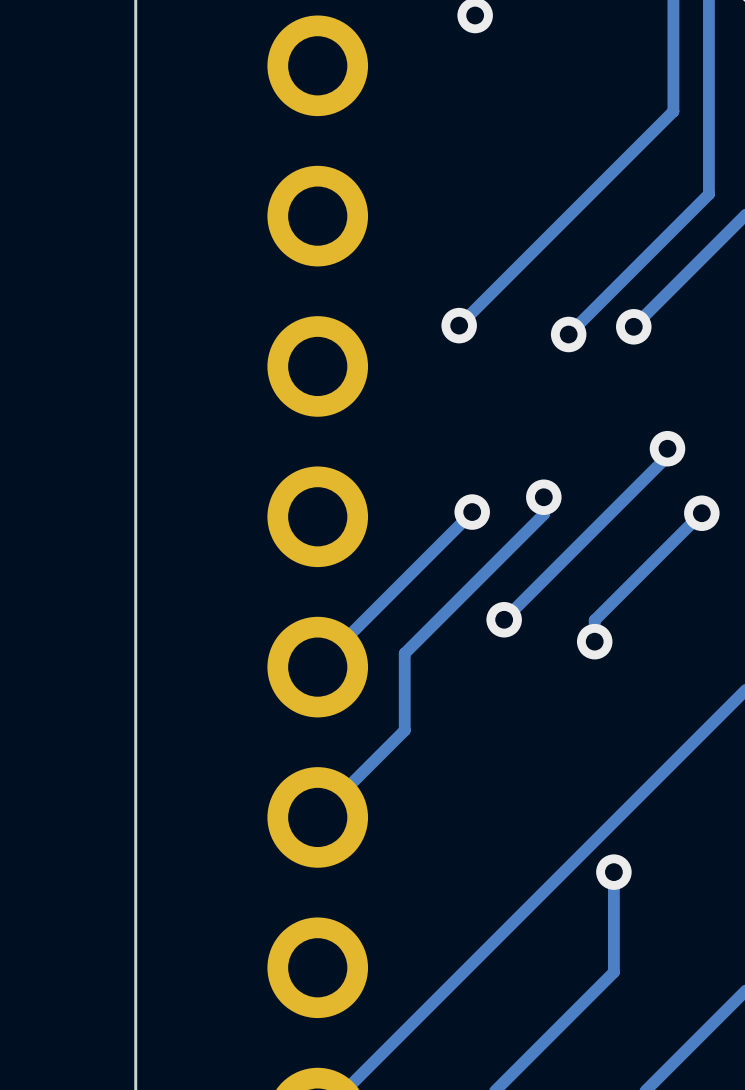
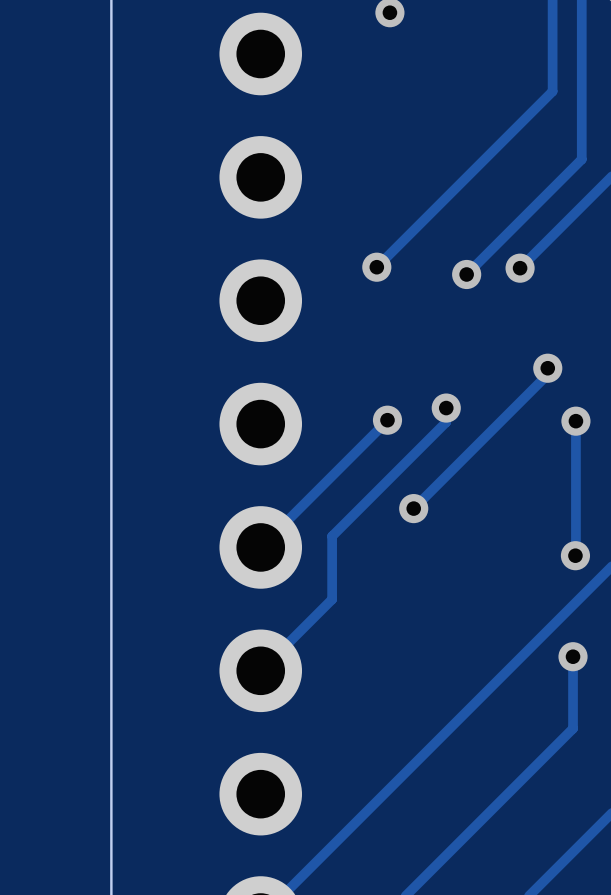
track: (701, 513) (594, 620) (594, 641) -> (575, 421) (575, 555)
via: (594, 641) -> none
via: none -> (575, 555)
via: none -> (573, 656)
track: (613, 872) (613, 972) -> (573, 656) (573, 728) (503, 797)
via: (613, 872) -> none

